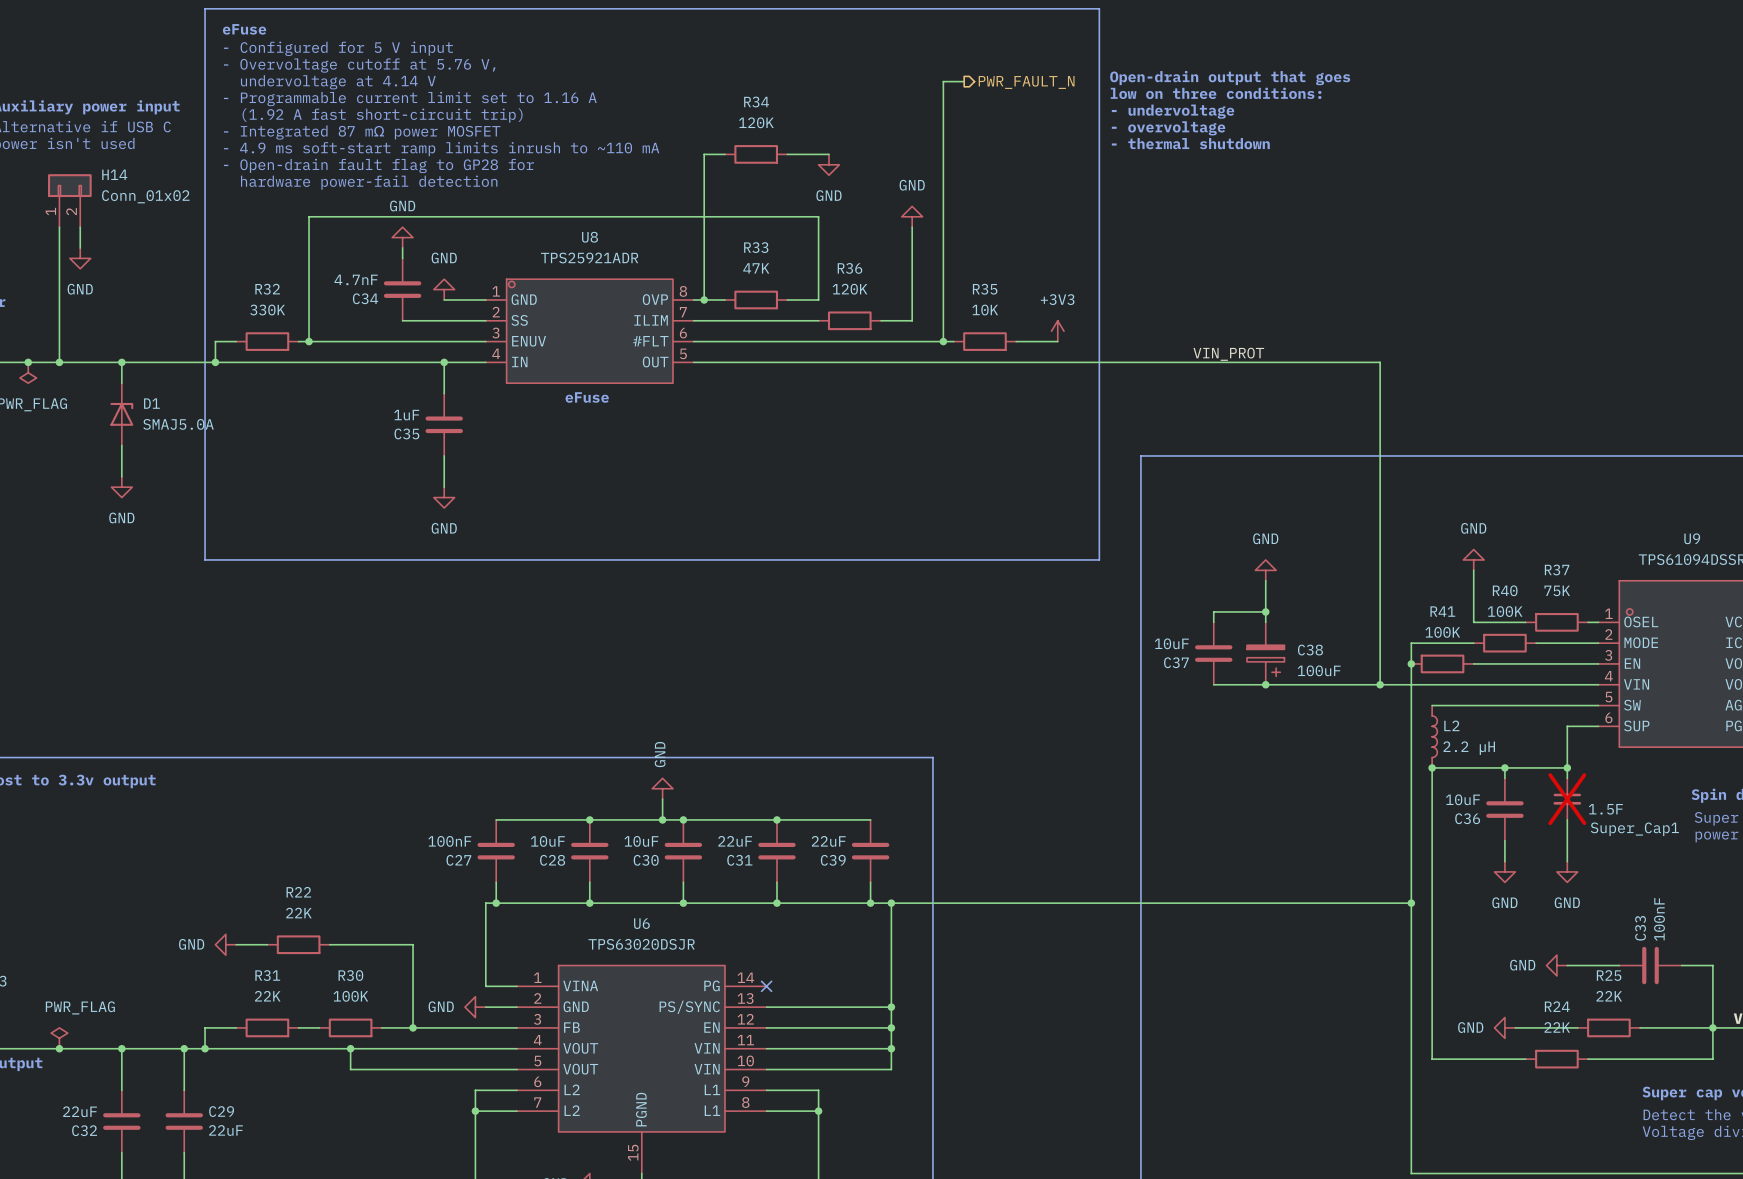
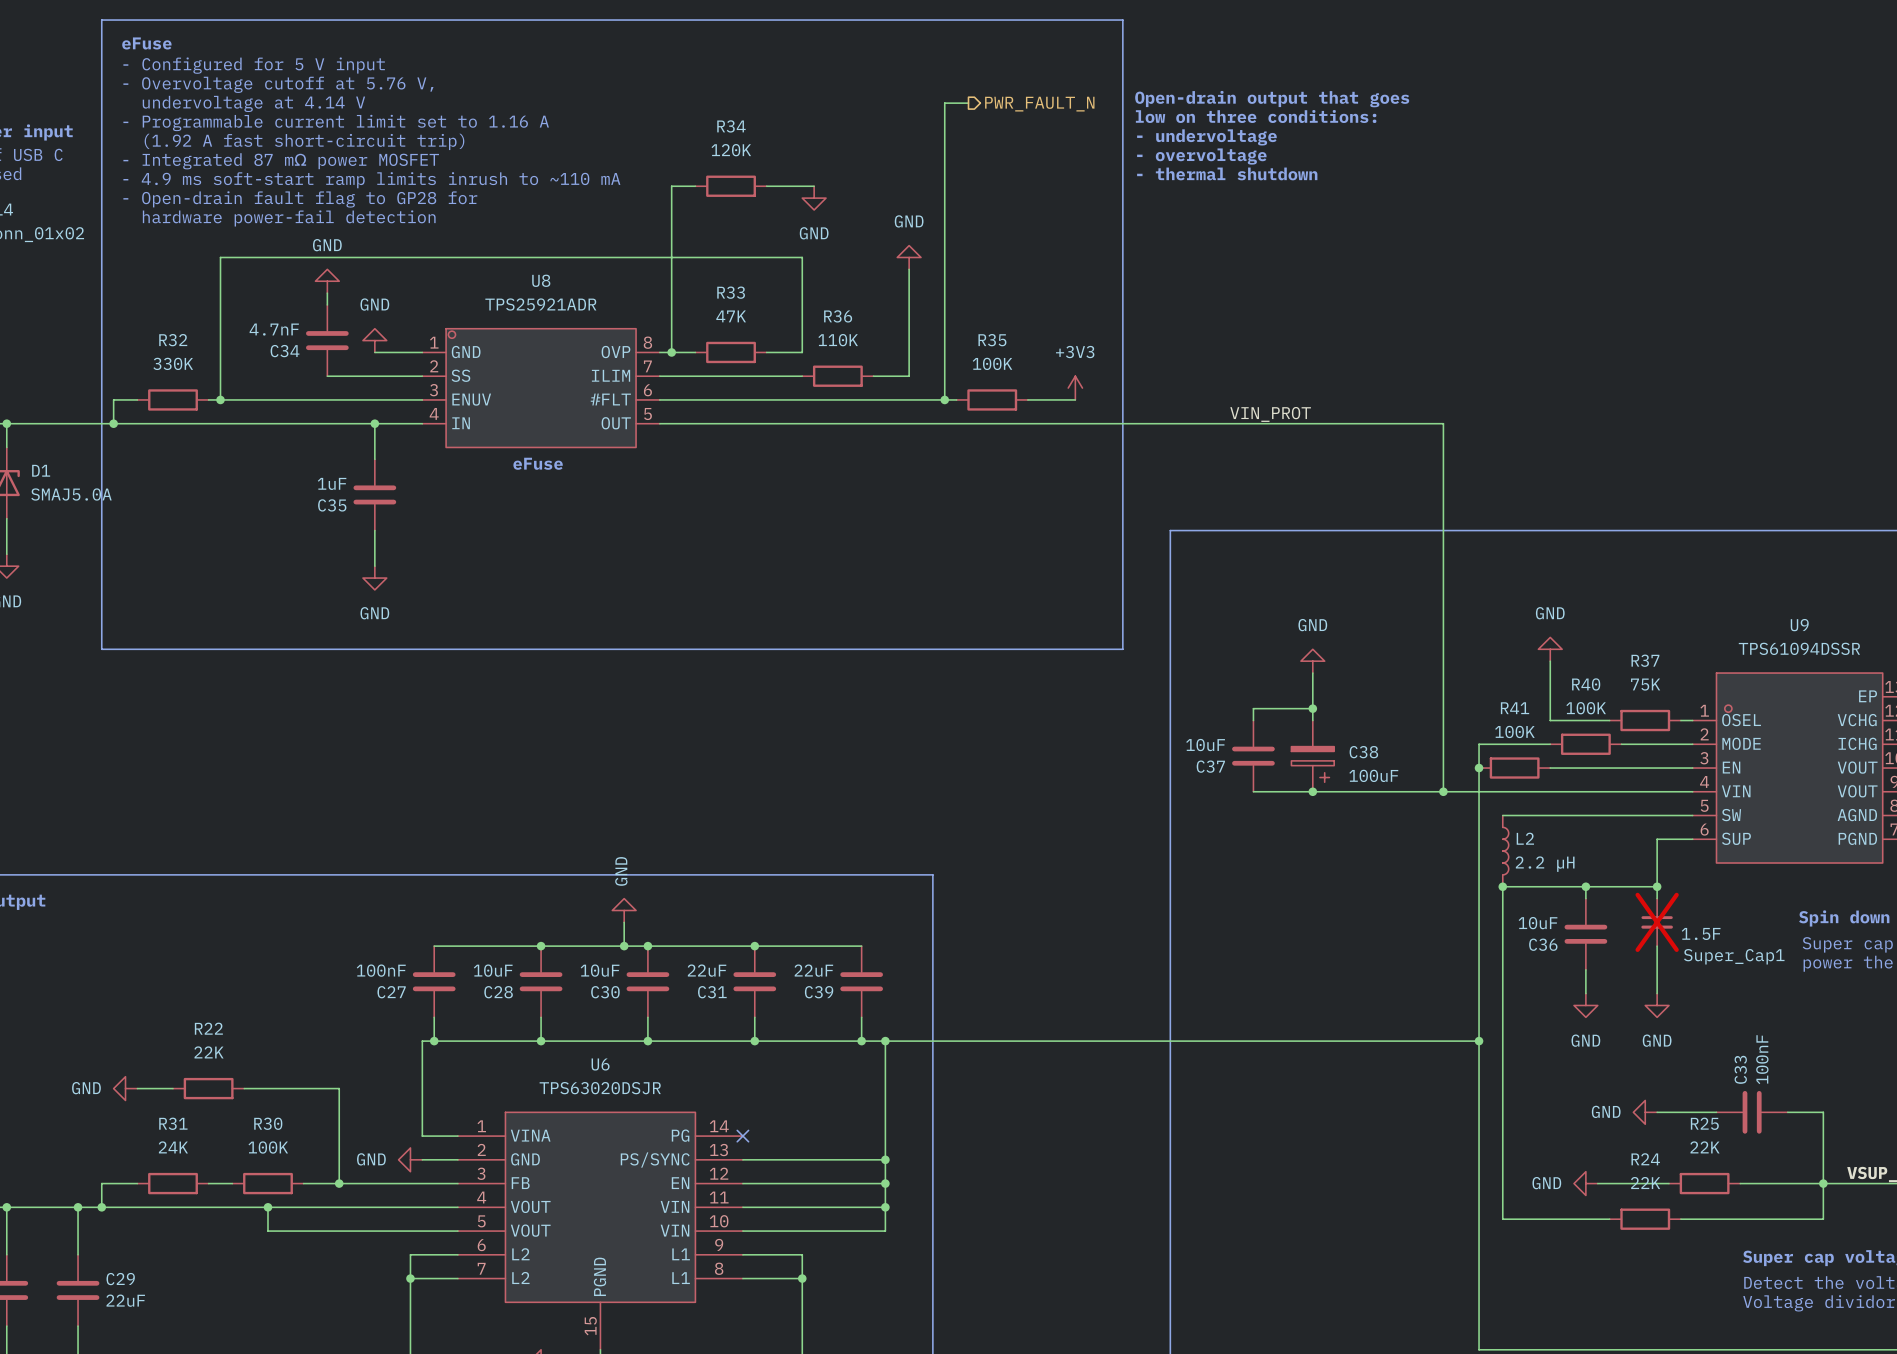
R36 value: 120K (850, 289) -> 110K (838, 340)
R35 value: 10K (985, 310) -> 100K (992, 363)
R31 value: 22K (267, 996) -> 24K (173, 1147)

